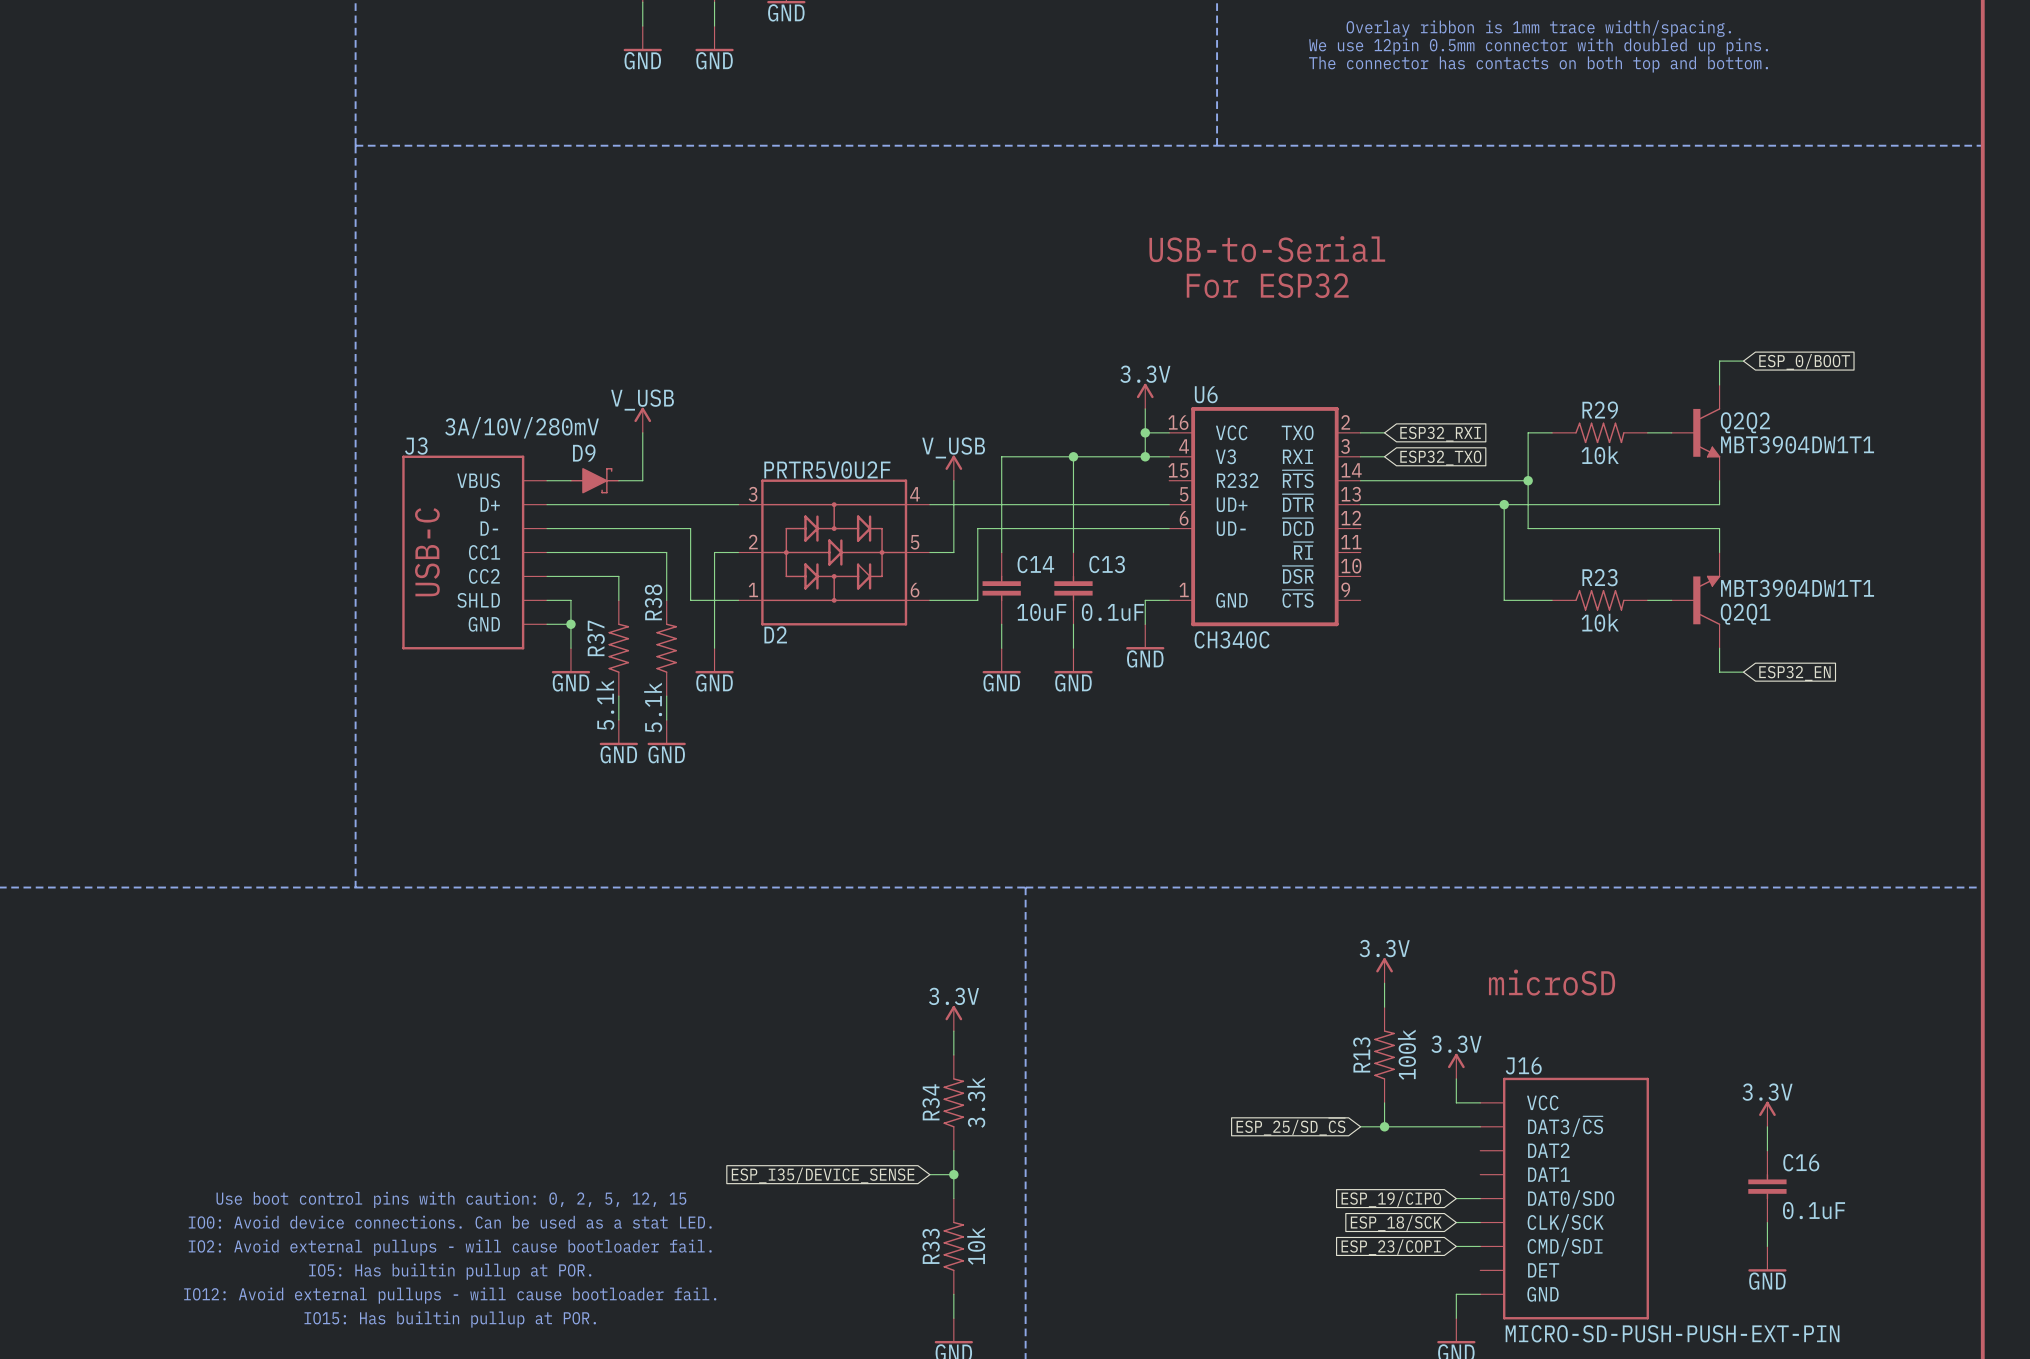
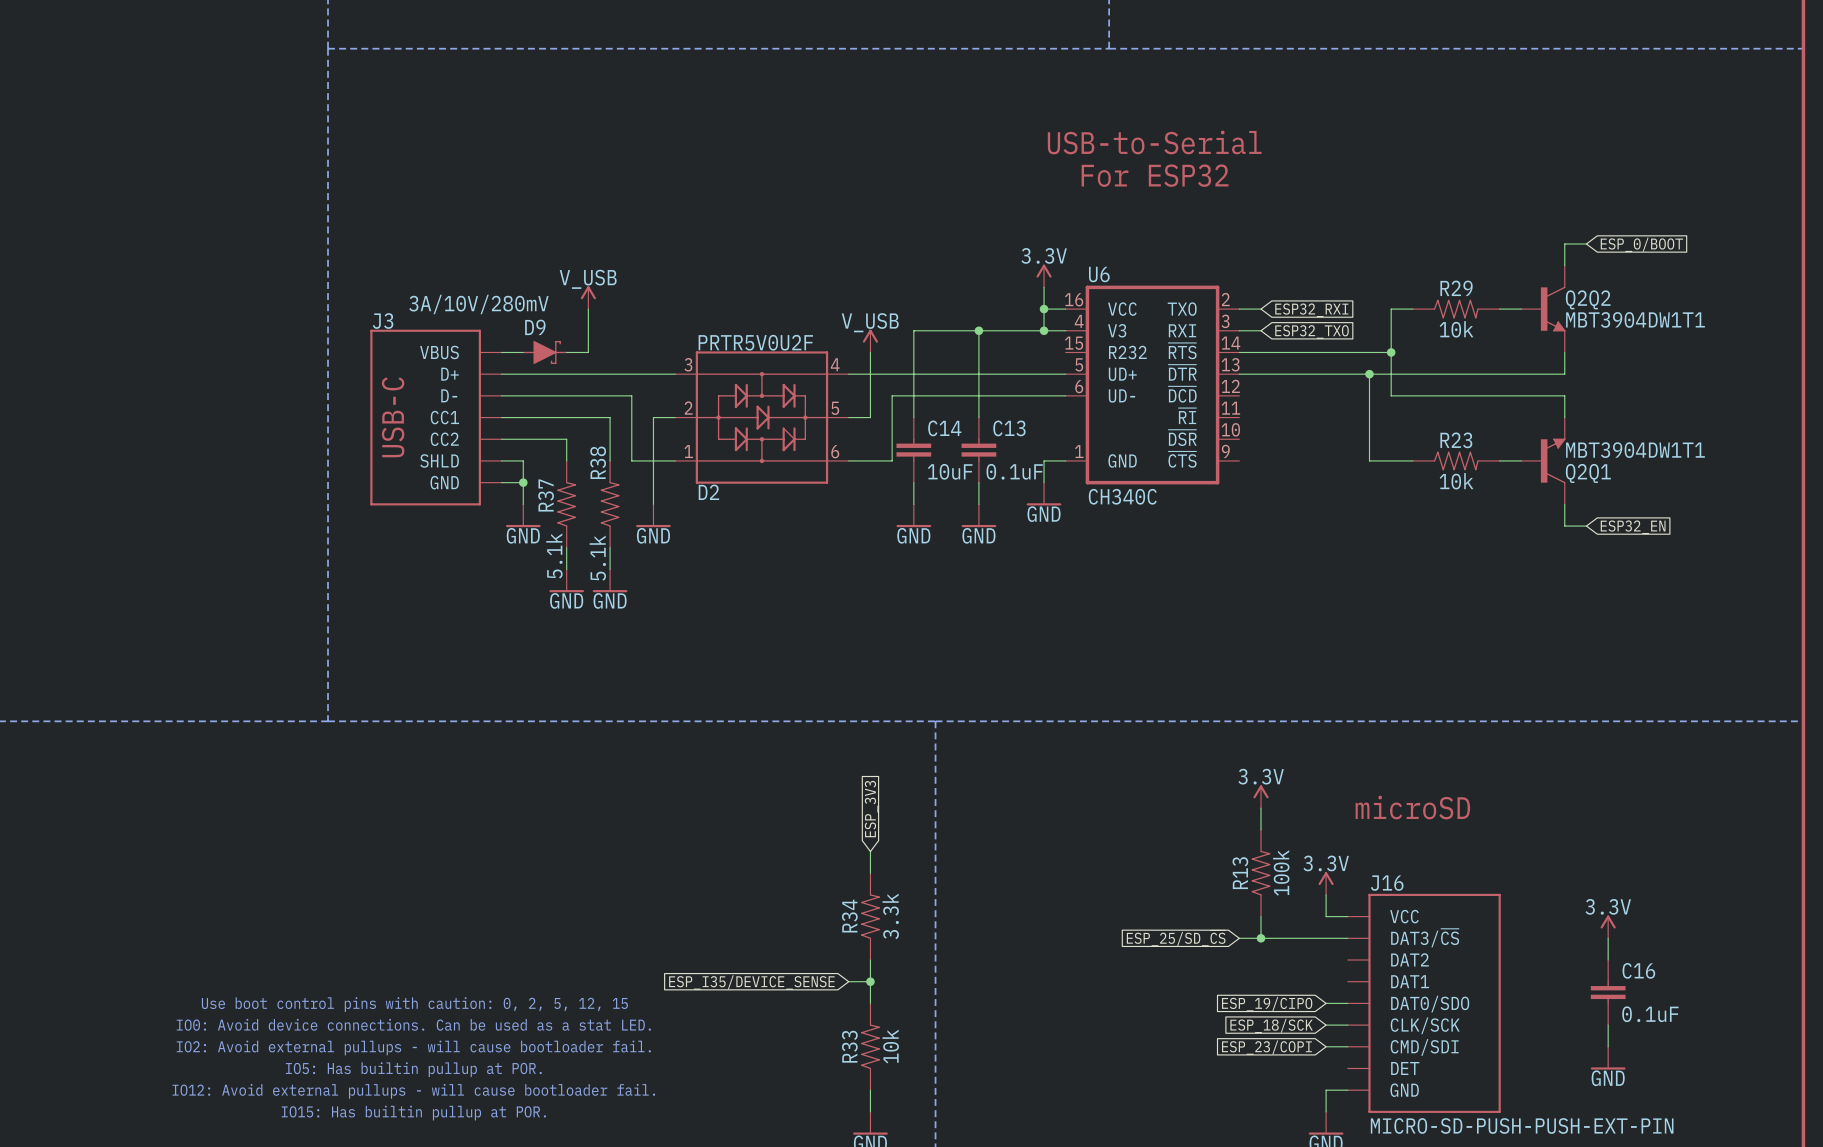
global label: none -> ESP_3V3 (871, 809)
power symbol: 3.3V (953, 1018) -> none

